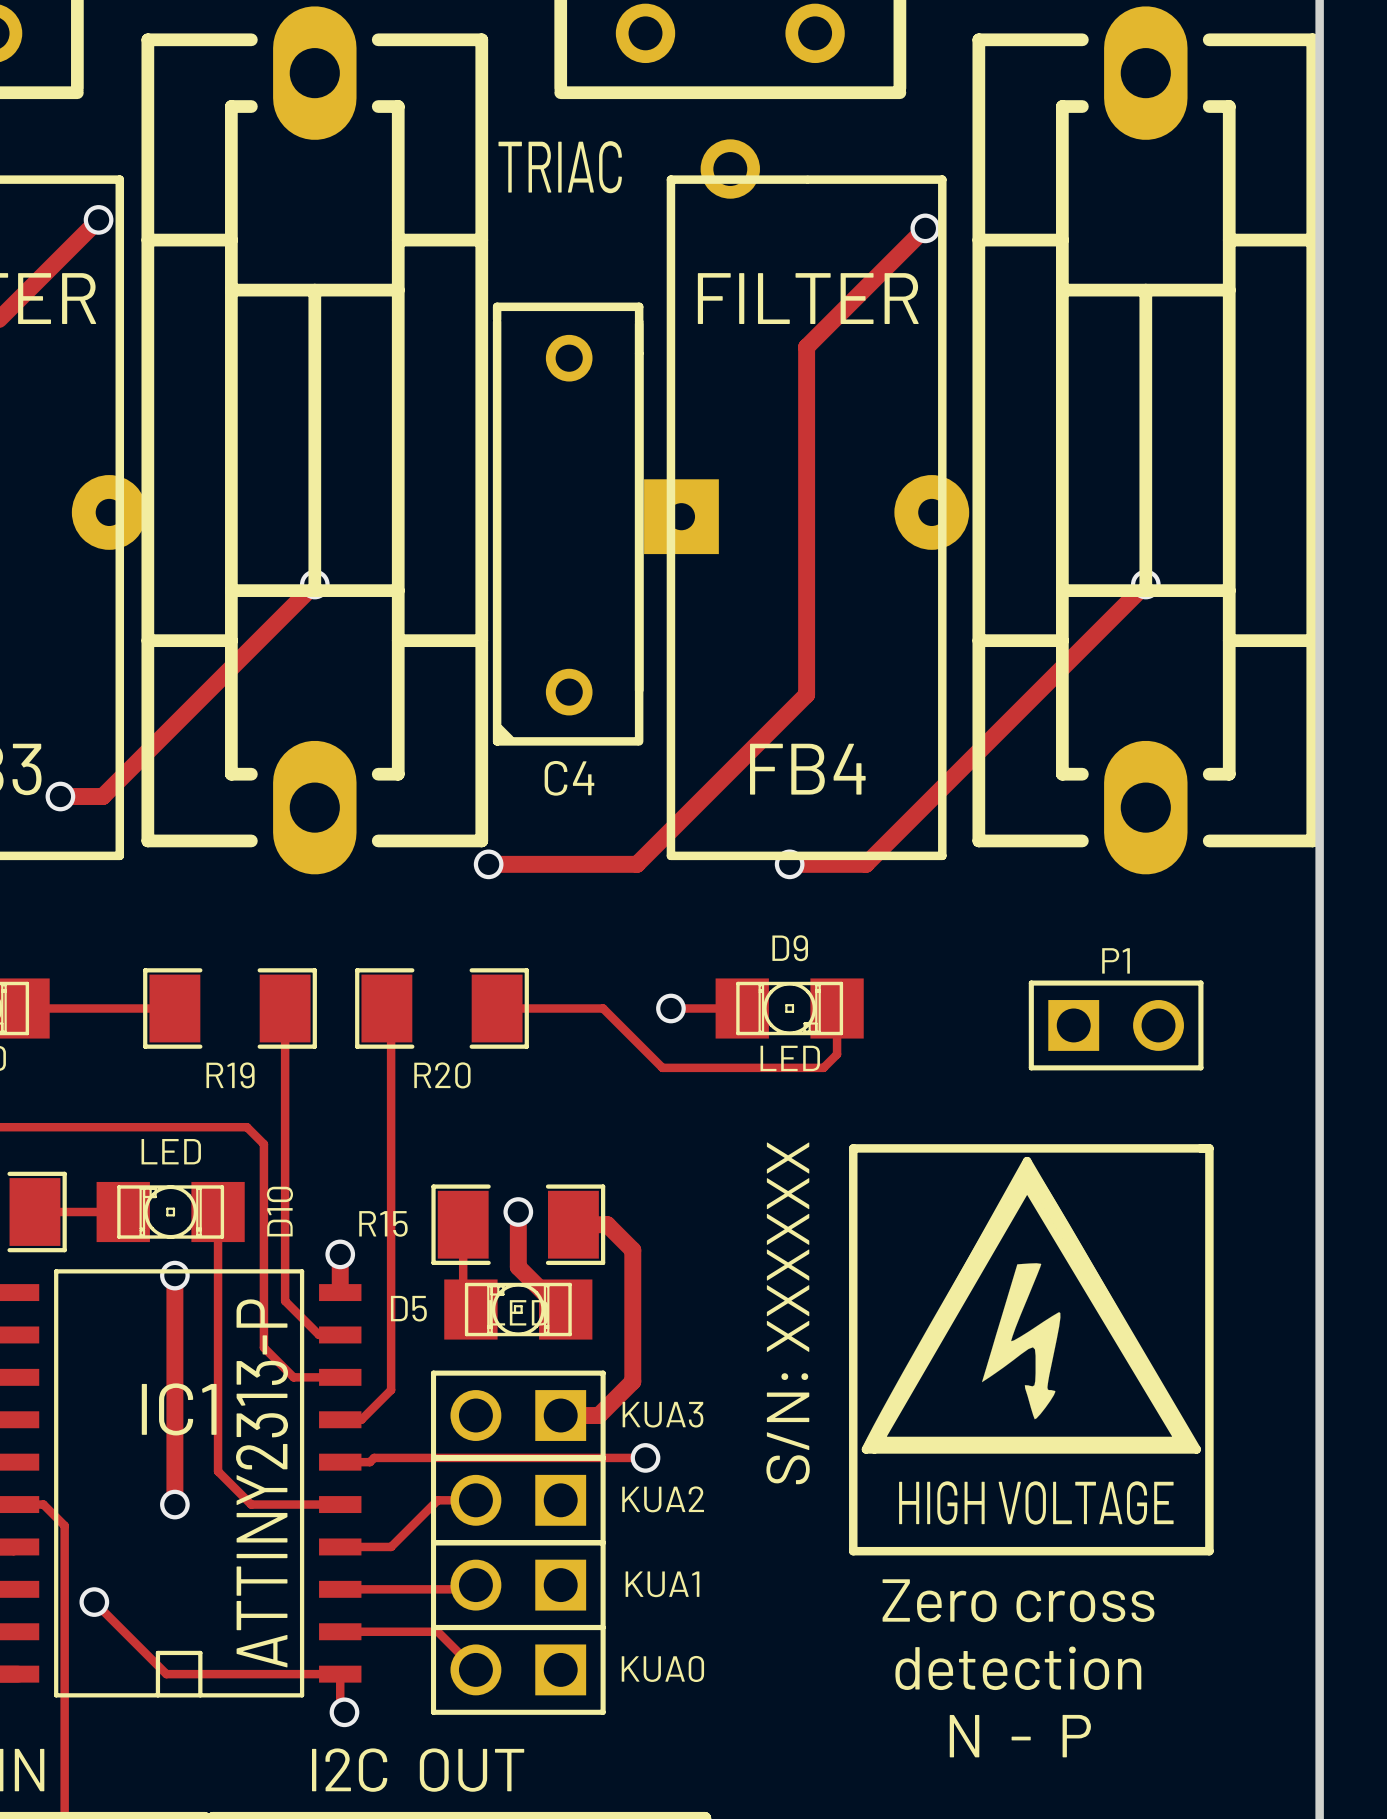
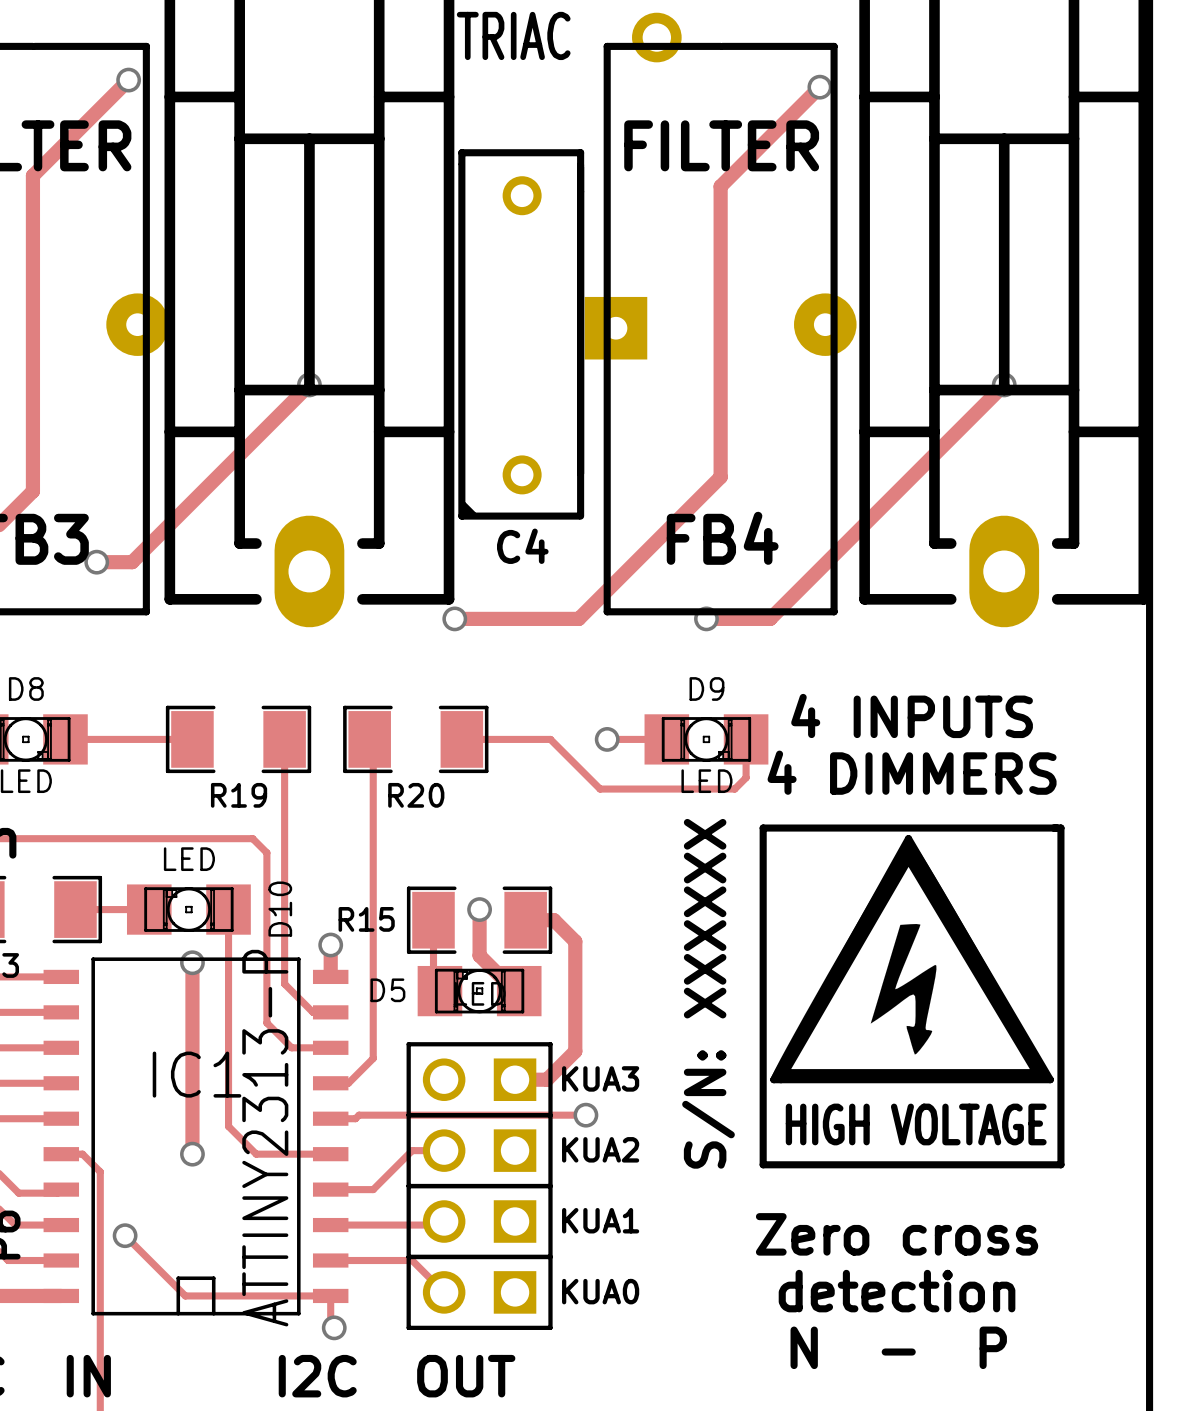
text: none -> 4 INPUTS (912, 715)
P1: (1116, 1025) -> none
text: none -> 4 DIMMERS (912, 772)
drawing position: (1031, 1349) -> (912, 996)

